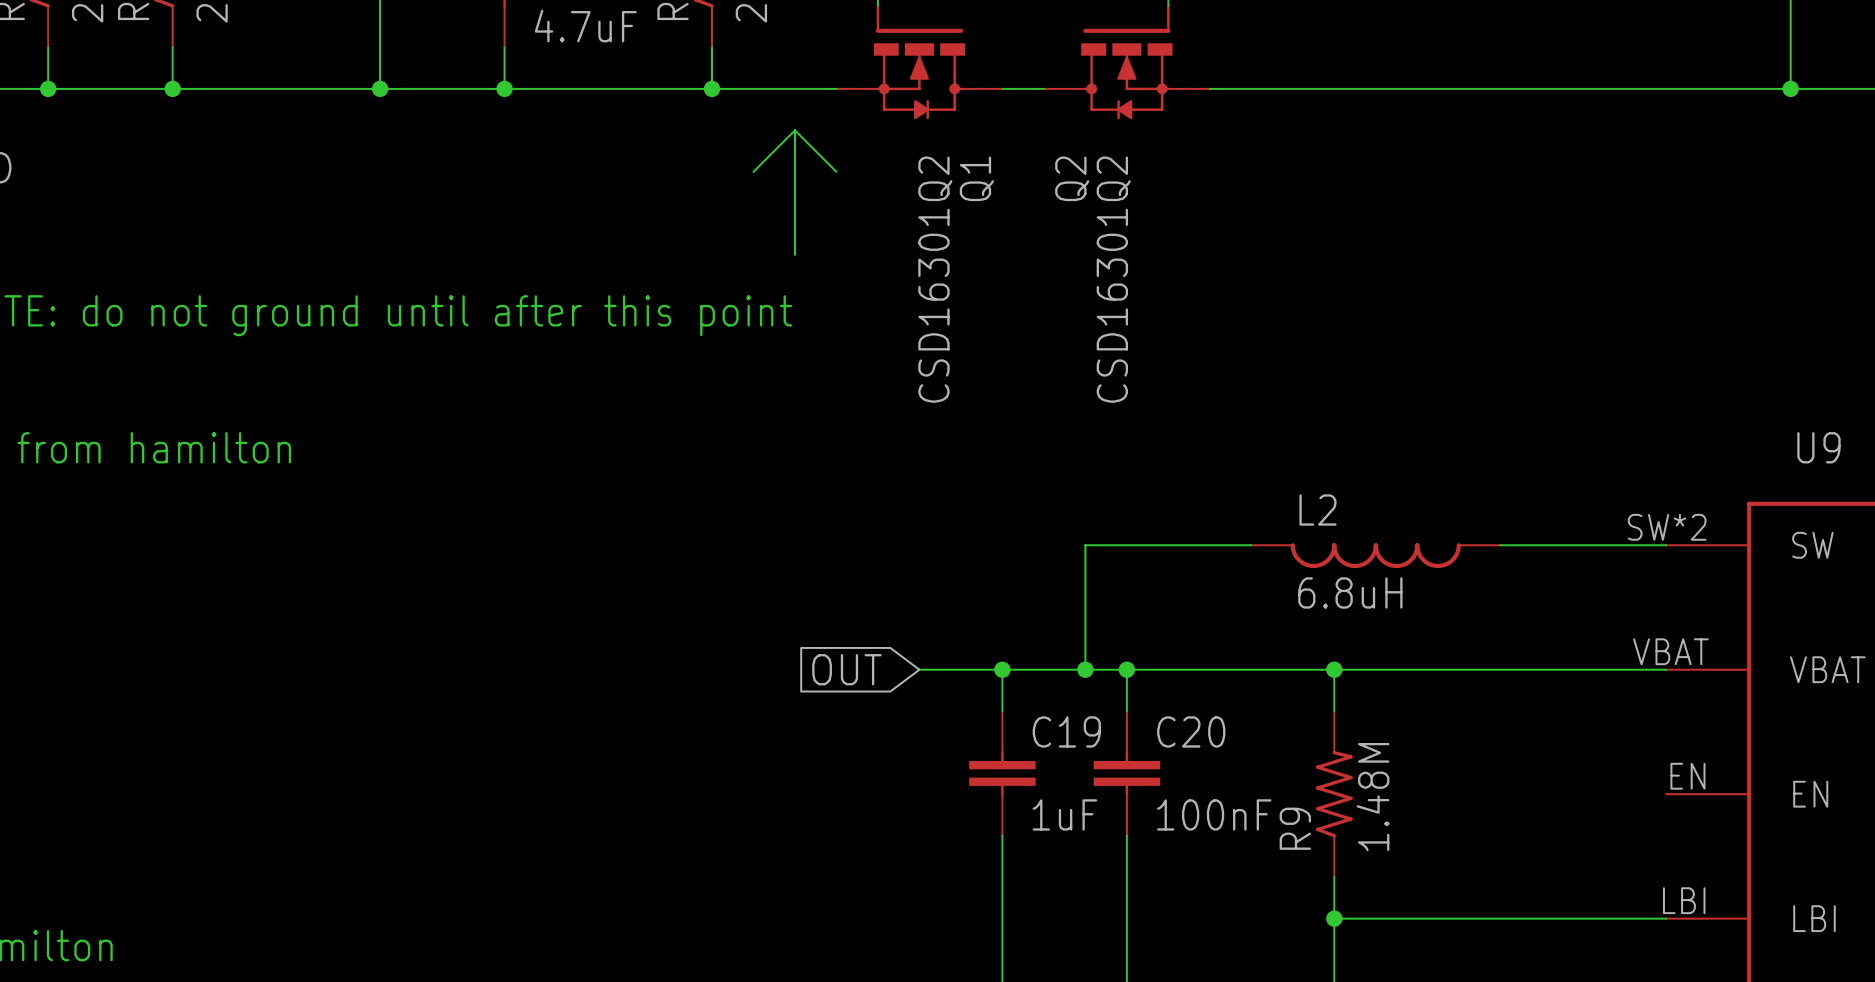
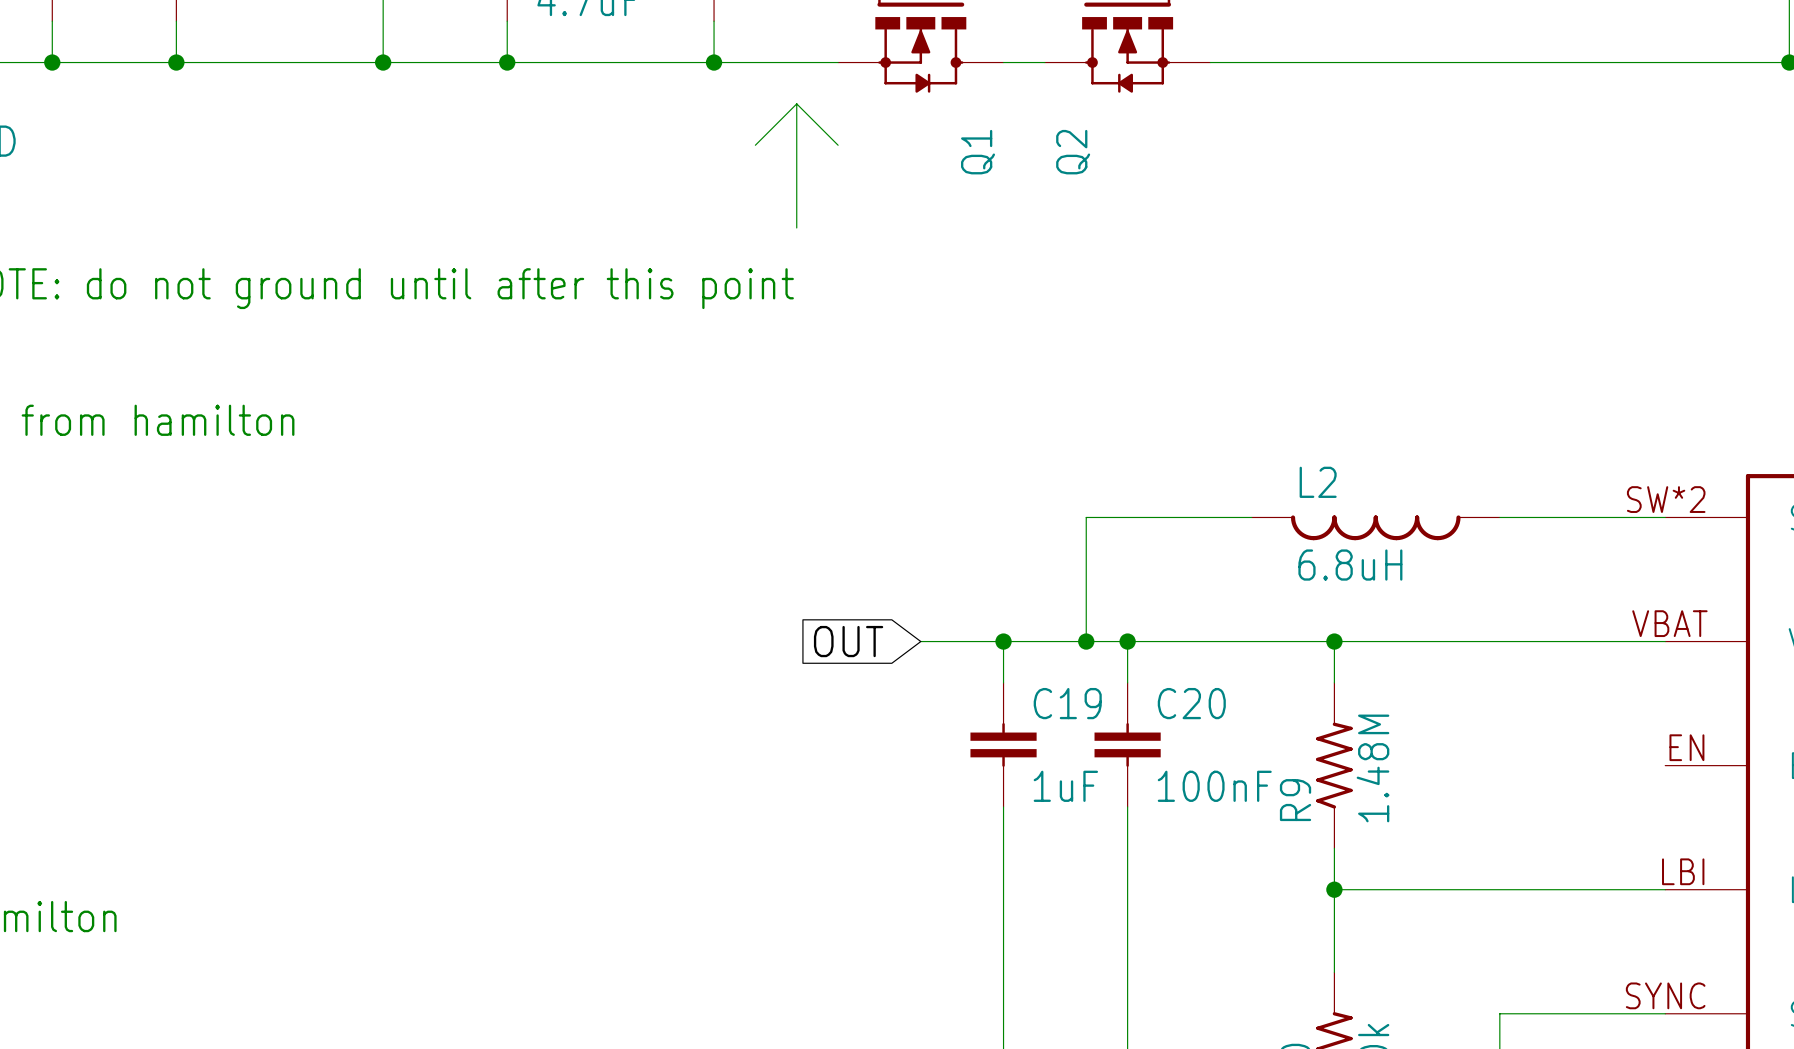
Q1 value: CSD16301Q2 (935, 279) -> none
Q2 value: CSD16301Q2 (1113, 279) -> none

